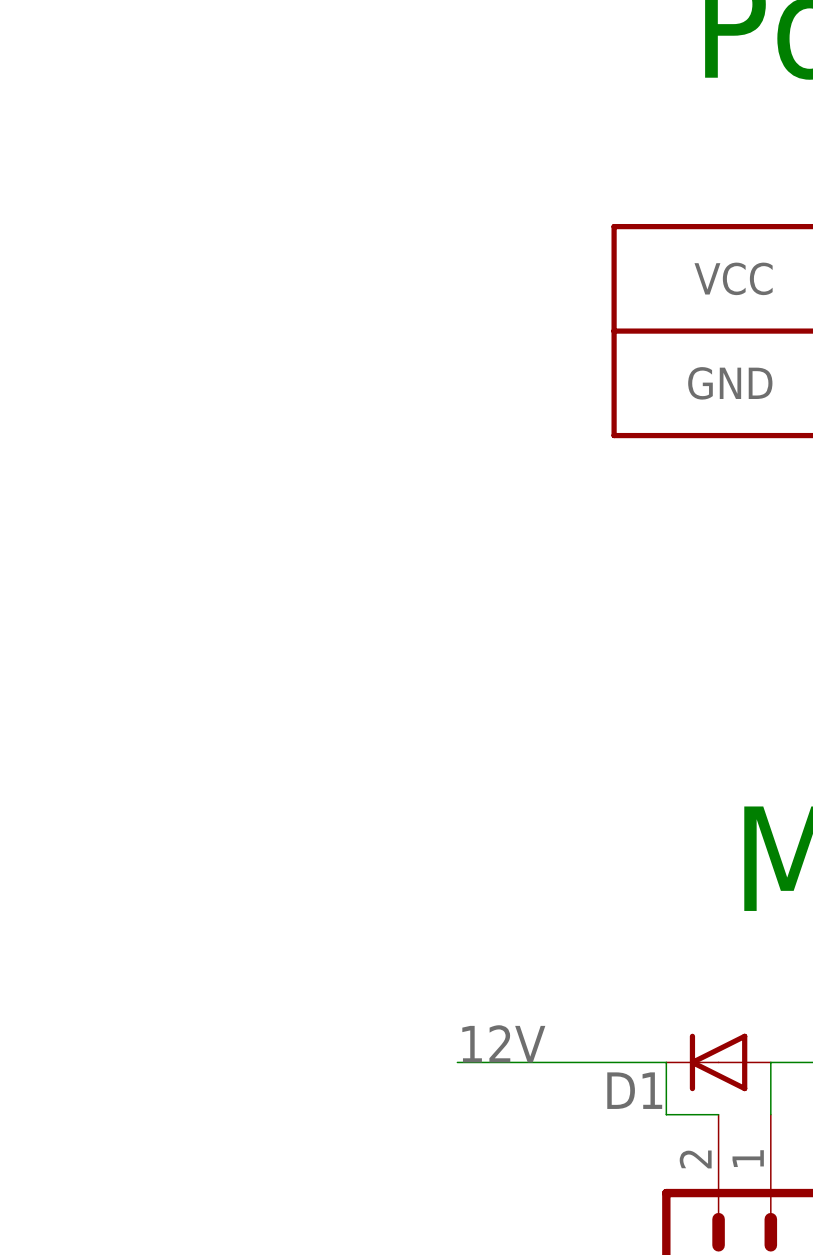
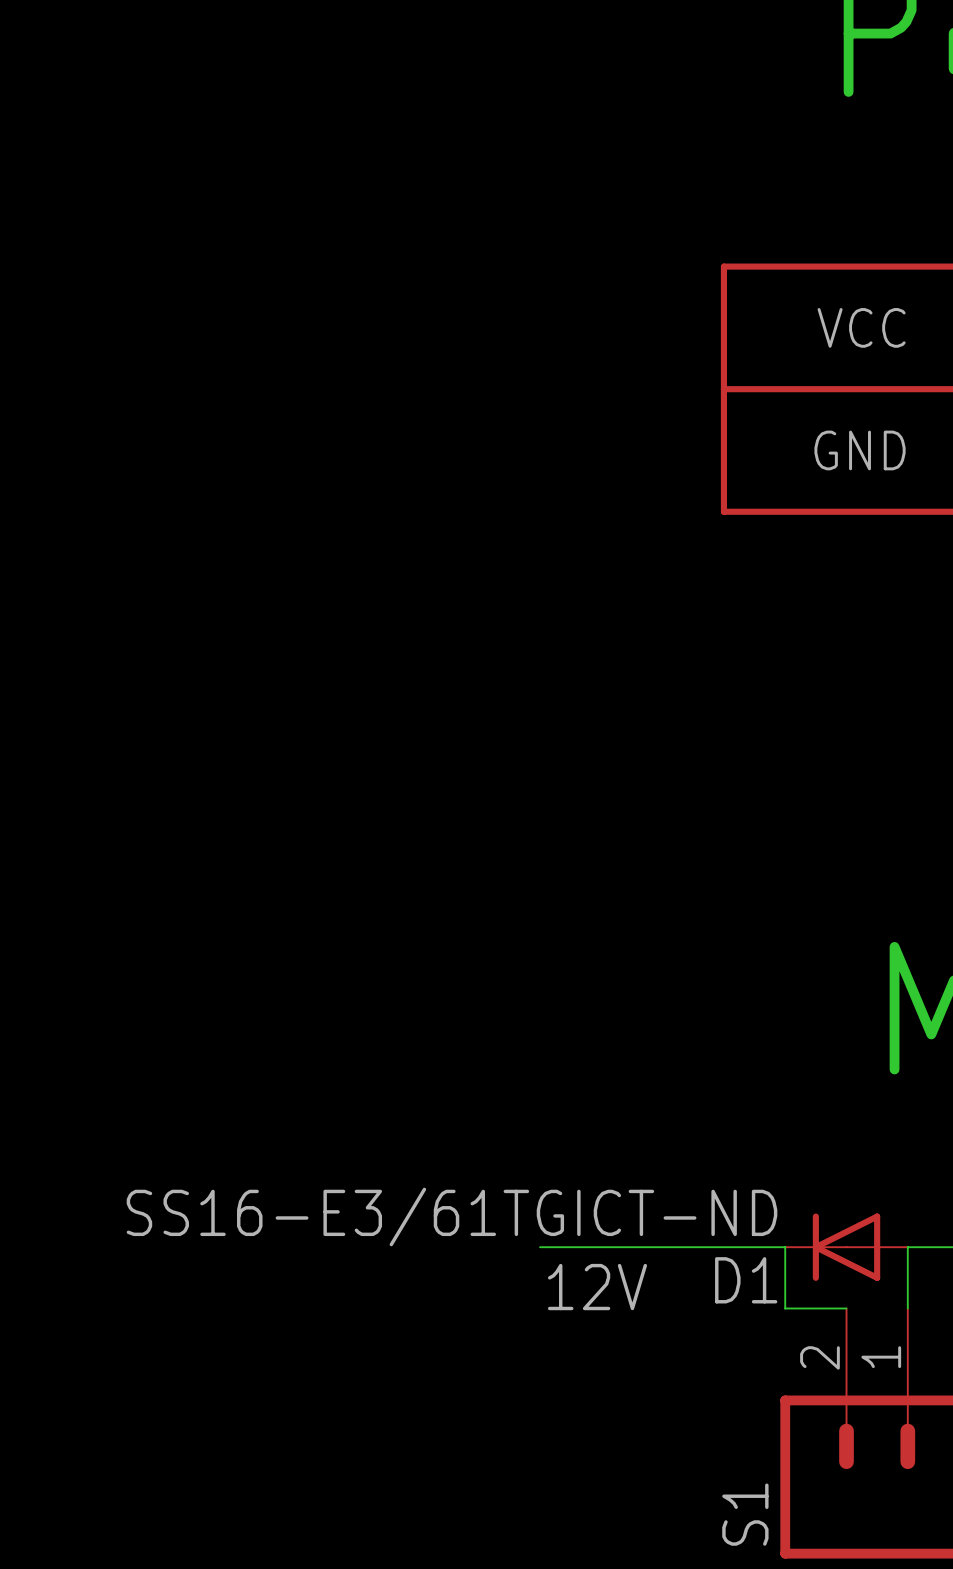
D1 value: none -> SS16-E3/61TGICT-ND (452, 1216)
label position: 12V (503, 1043) -> 12V (597, 1287)

